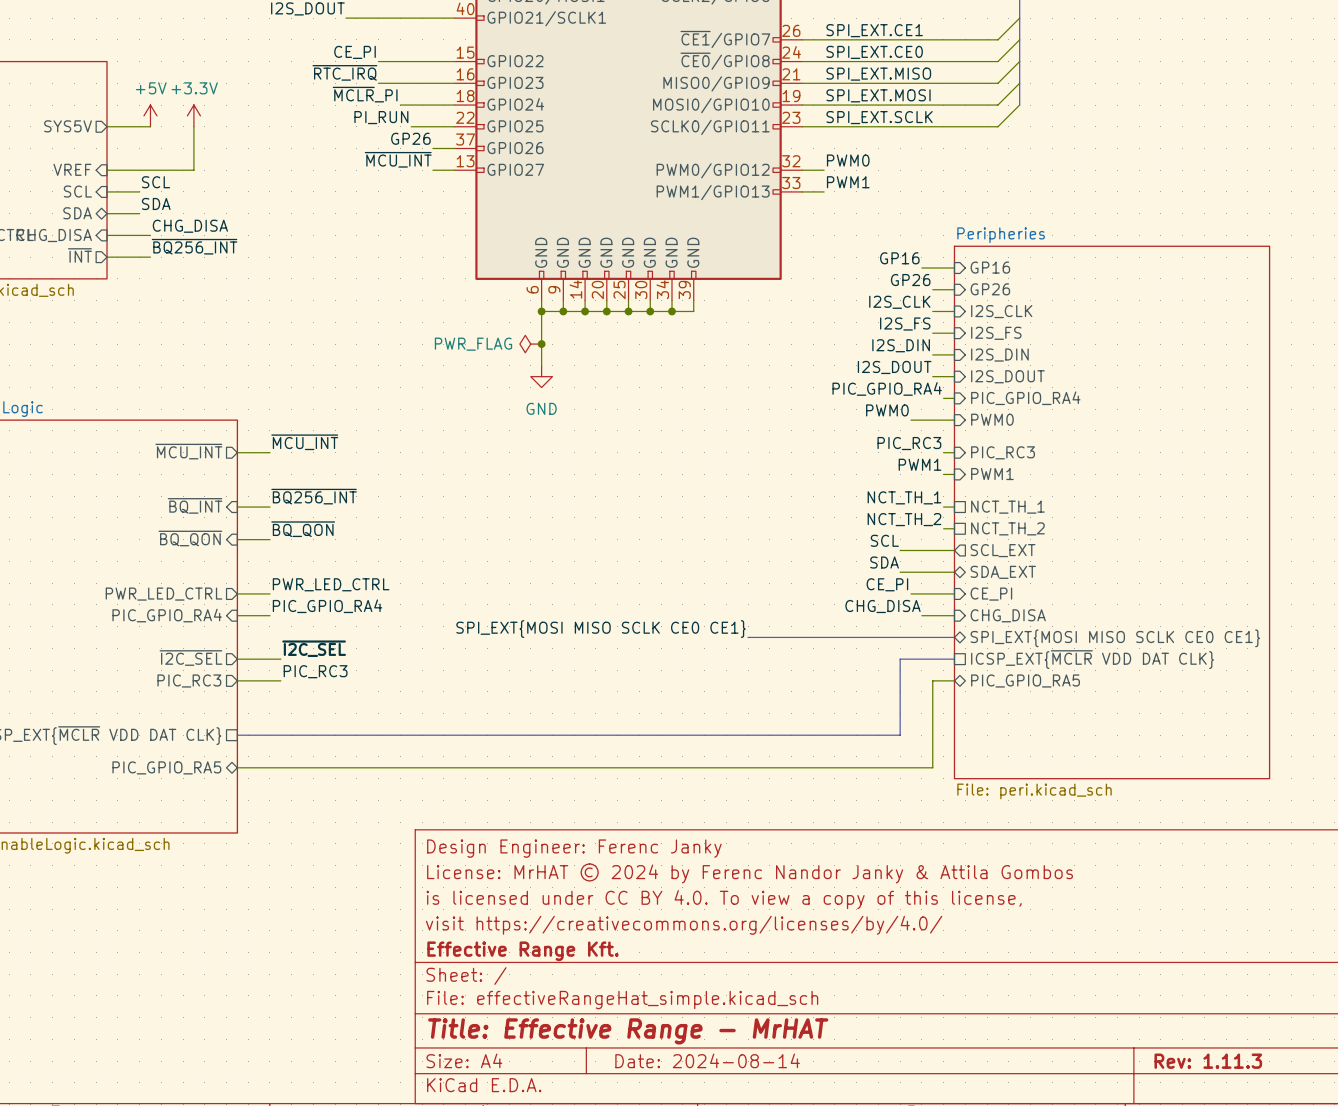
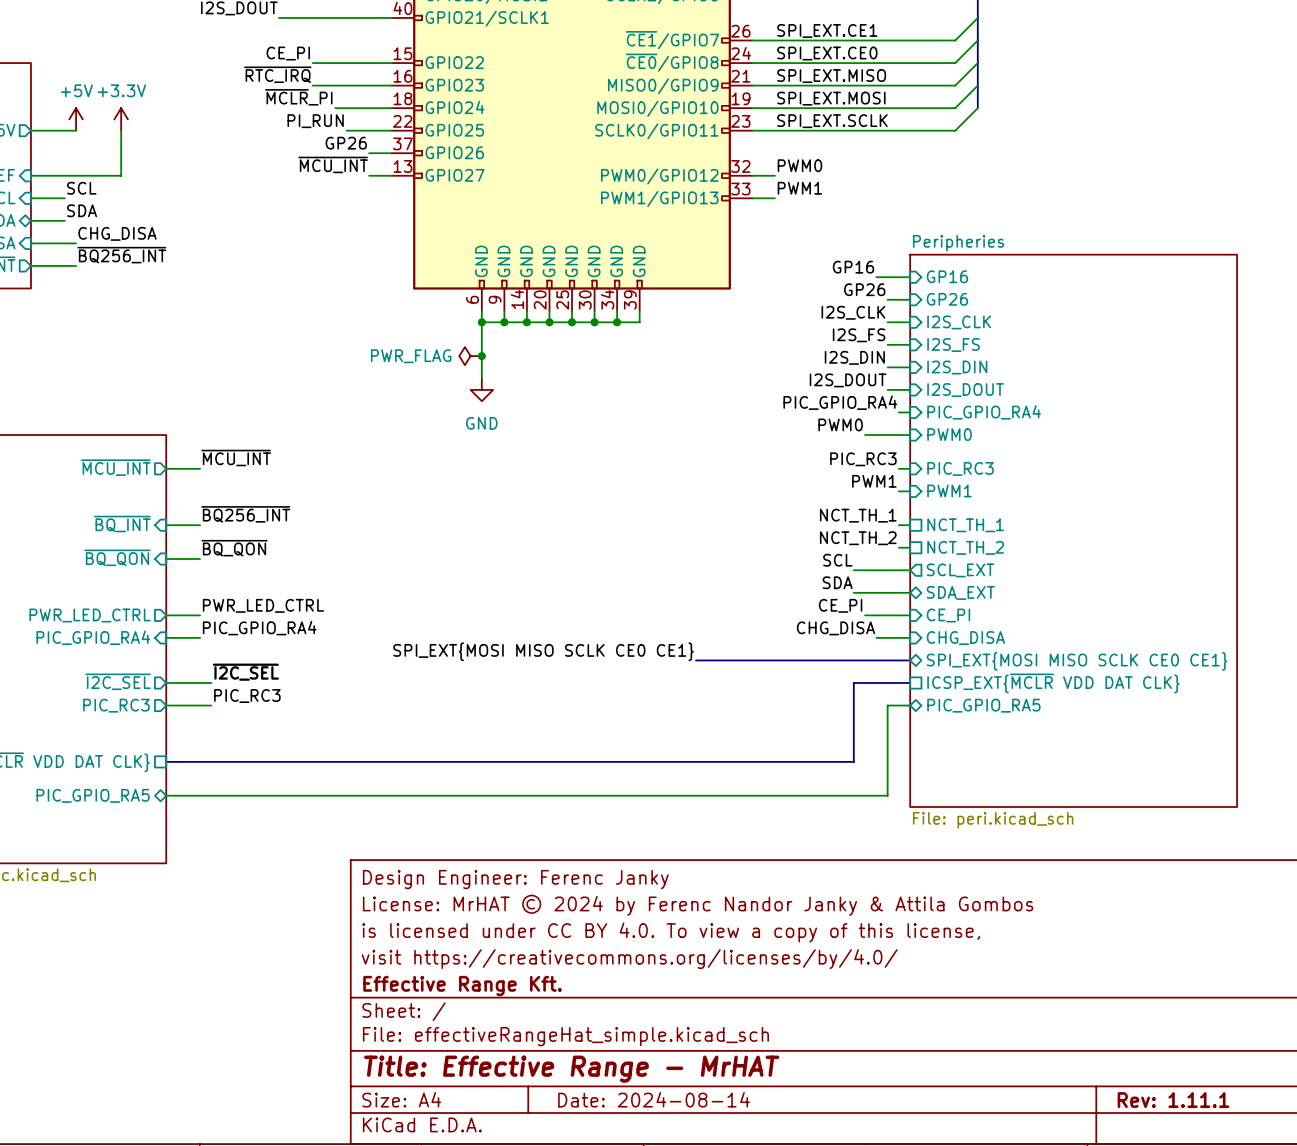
title block: Rev: 1.11.3 (1208, 1061) -> Rev: 1.11.1 (1173, 1100)

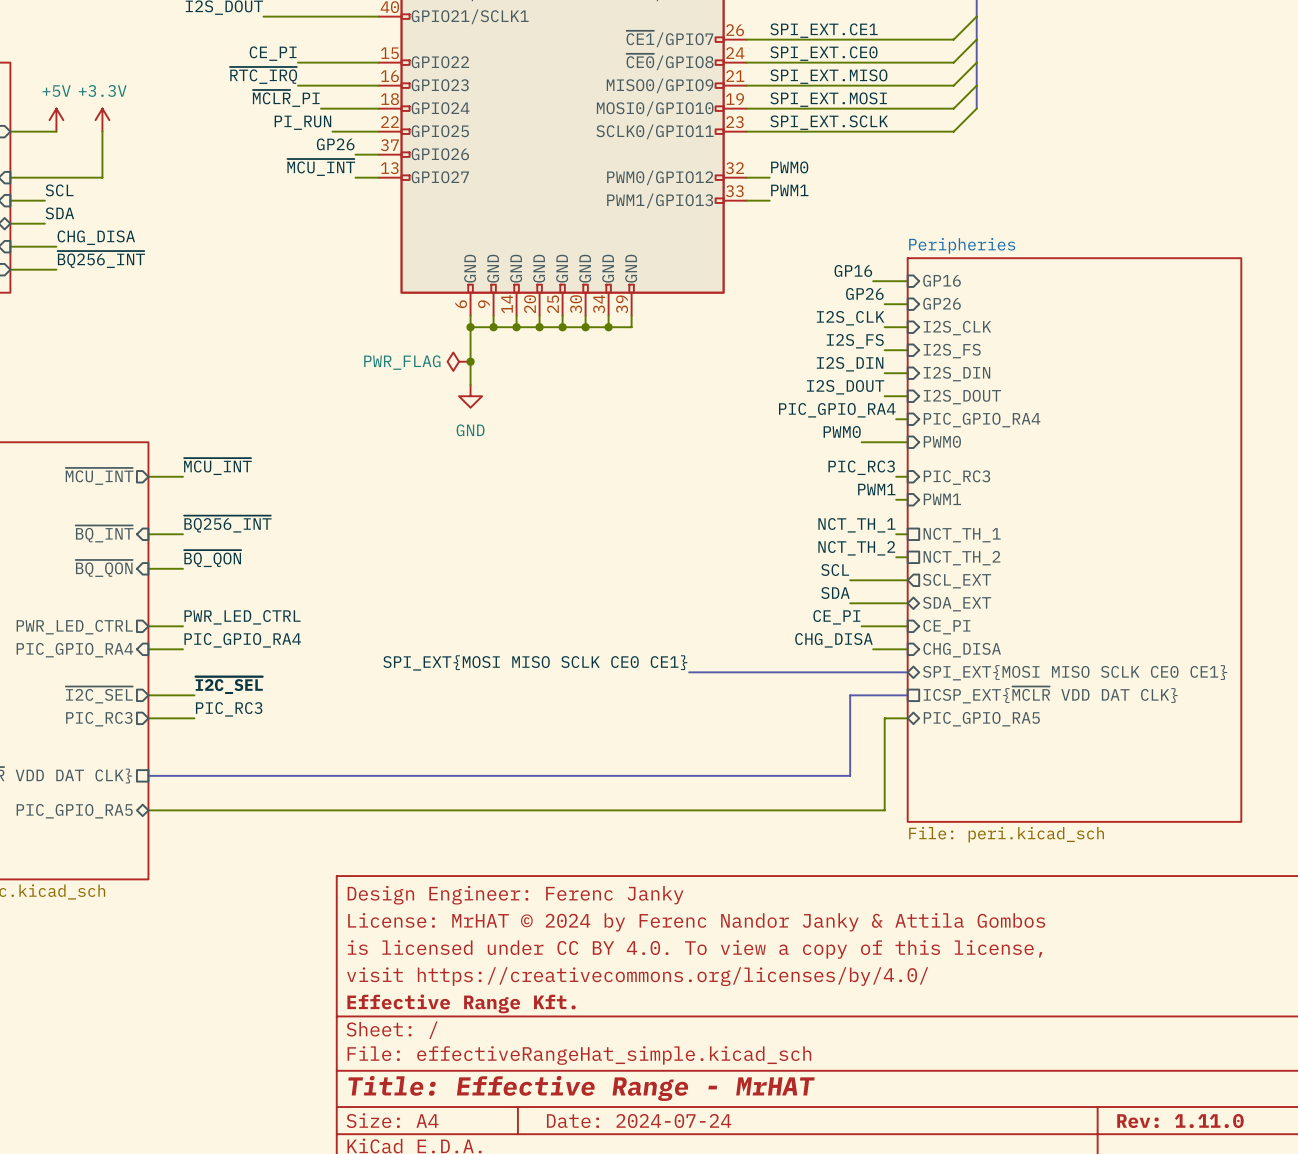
title block: Date: 2024-08-14 (654, 1099) -> Date: 2024-07-24 (639, 1121)
title block: Rev: 1.11.1 (1173, 1100) -> Rev: 1.11.0 (1180, 1121)

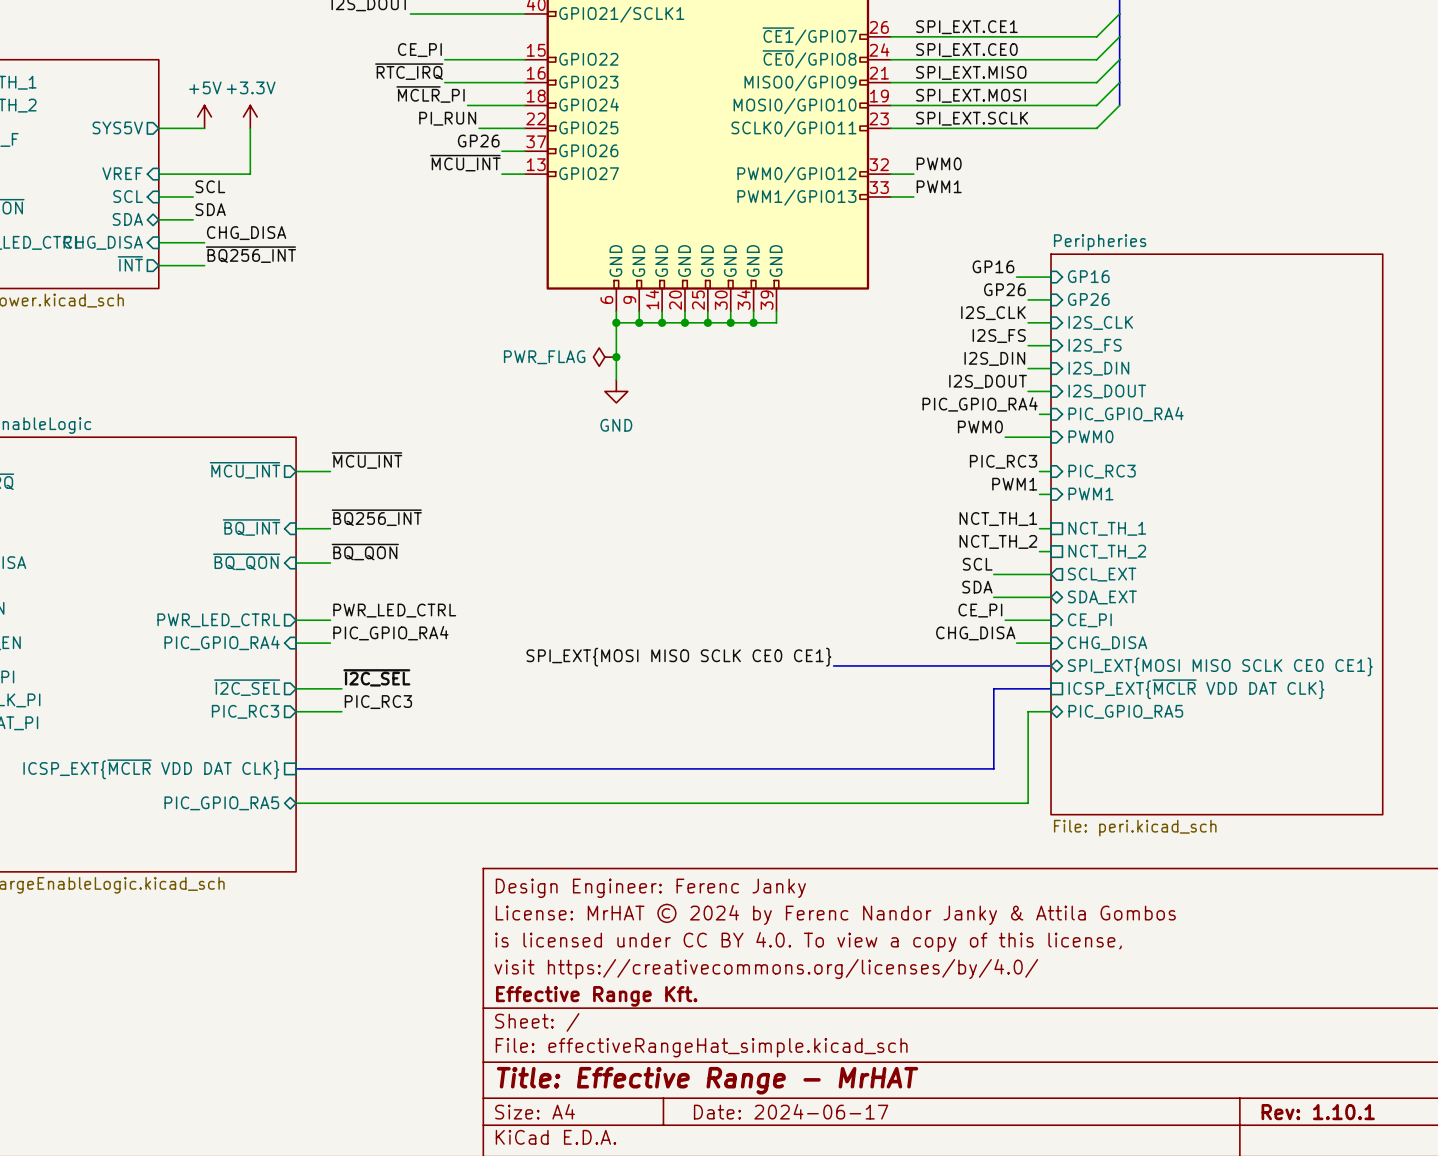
title block: Date: 2024-07-24 (639, 1121) -> Date: 2024-06-17 (791, 1111)
title block: Rev: 1.11.0 (1180, 1121) -> Rev: 1.10.1 (1318, 1112)

